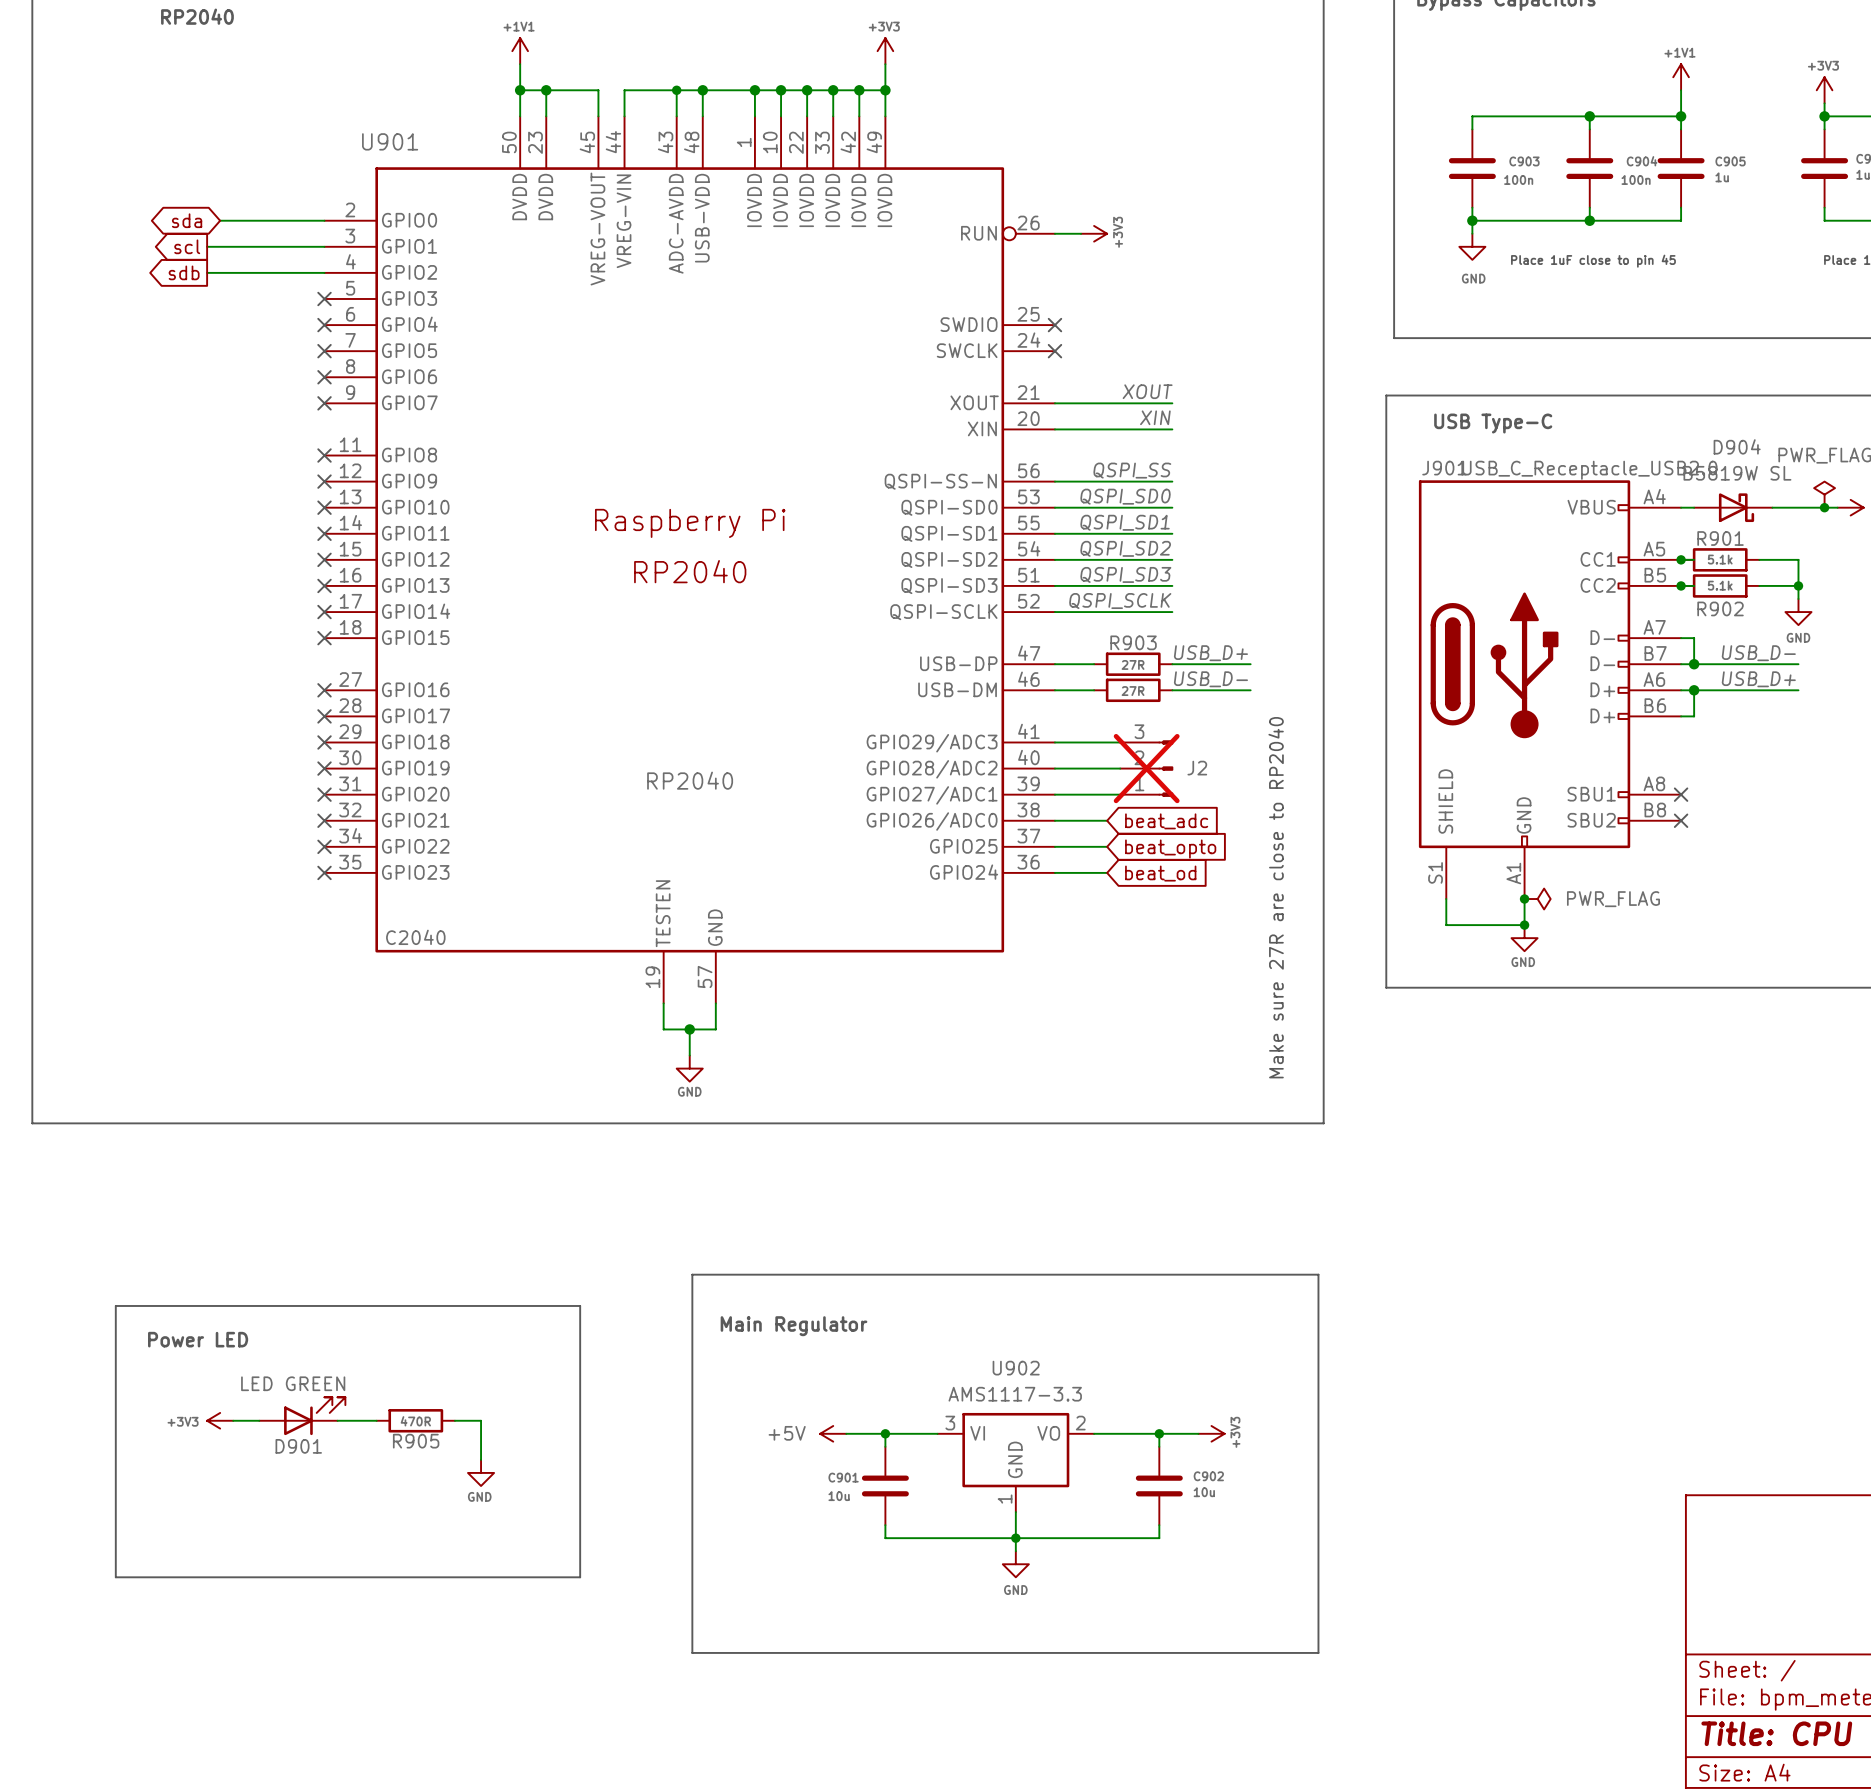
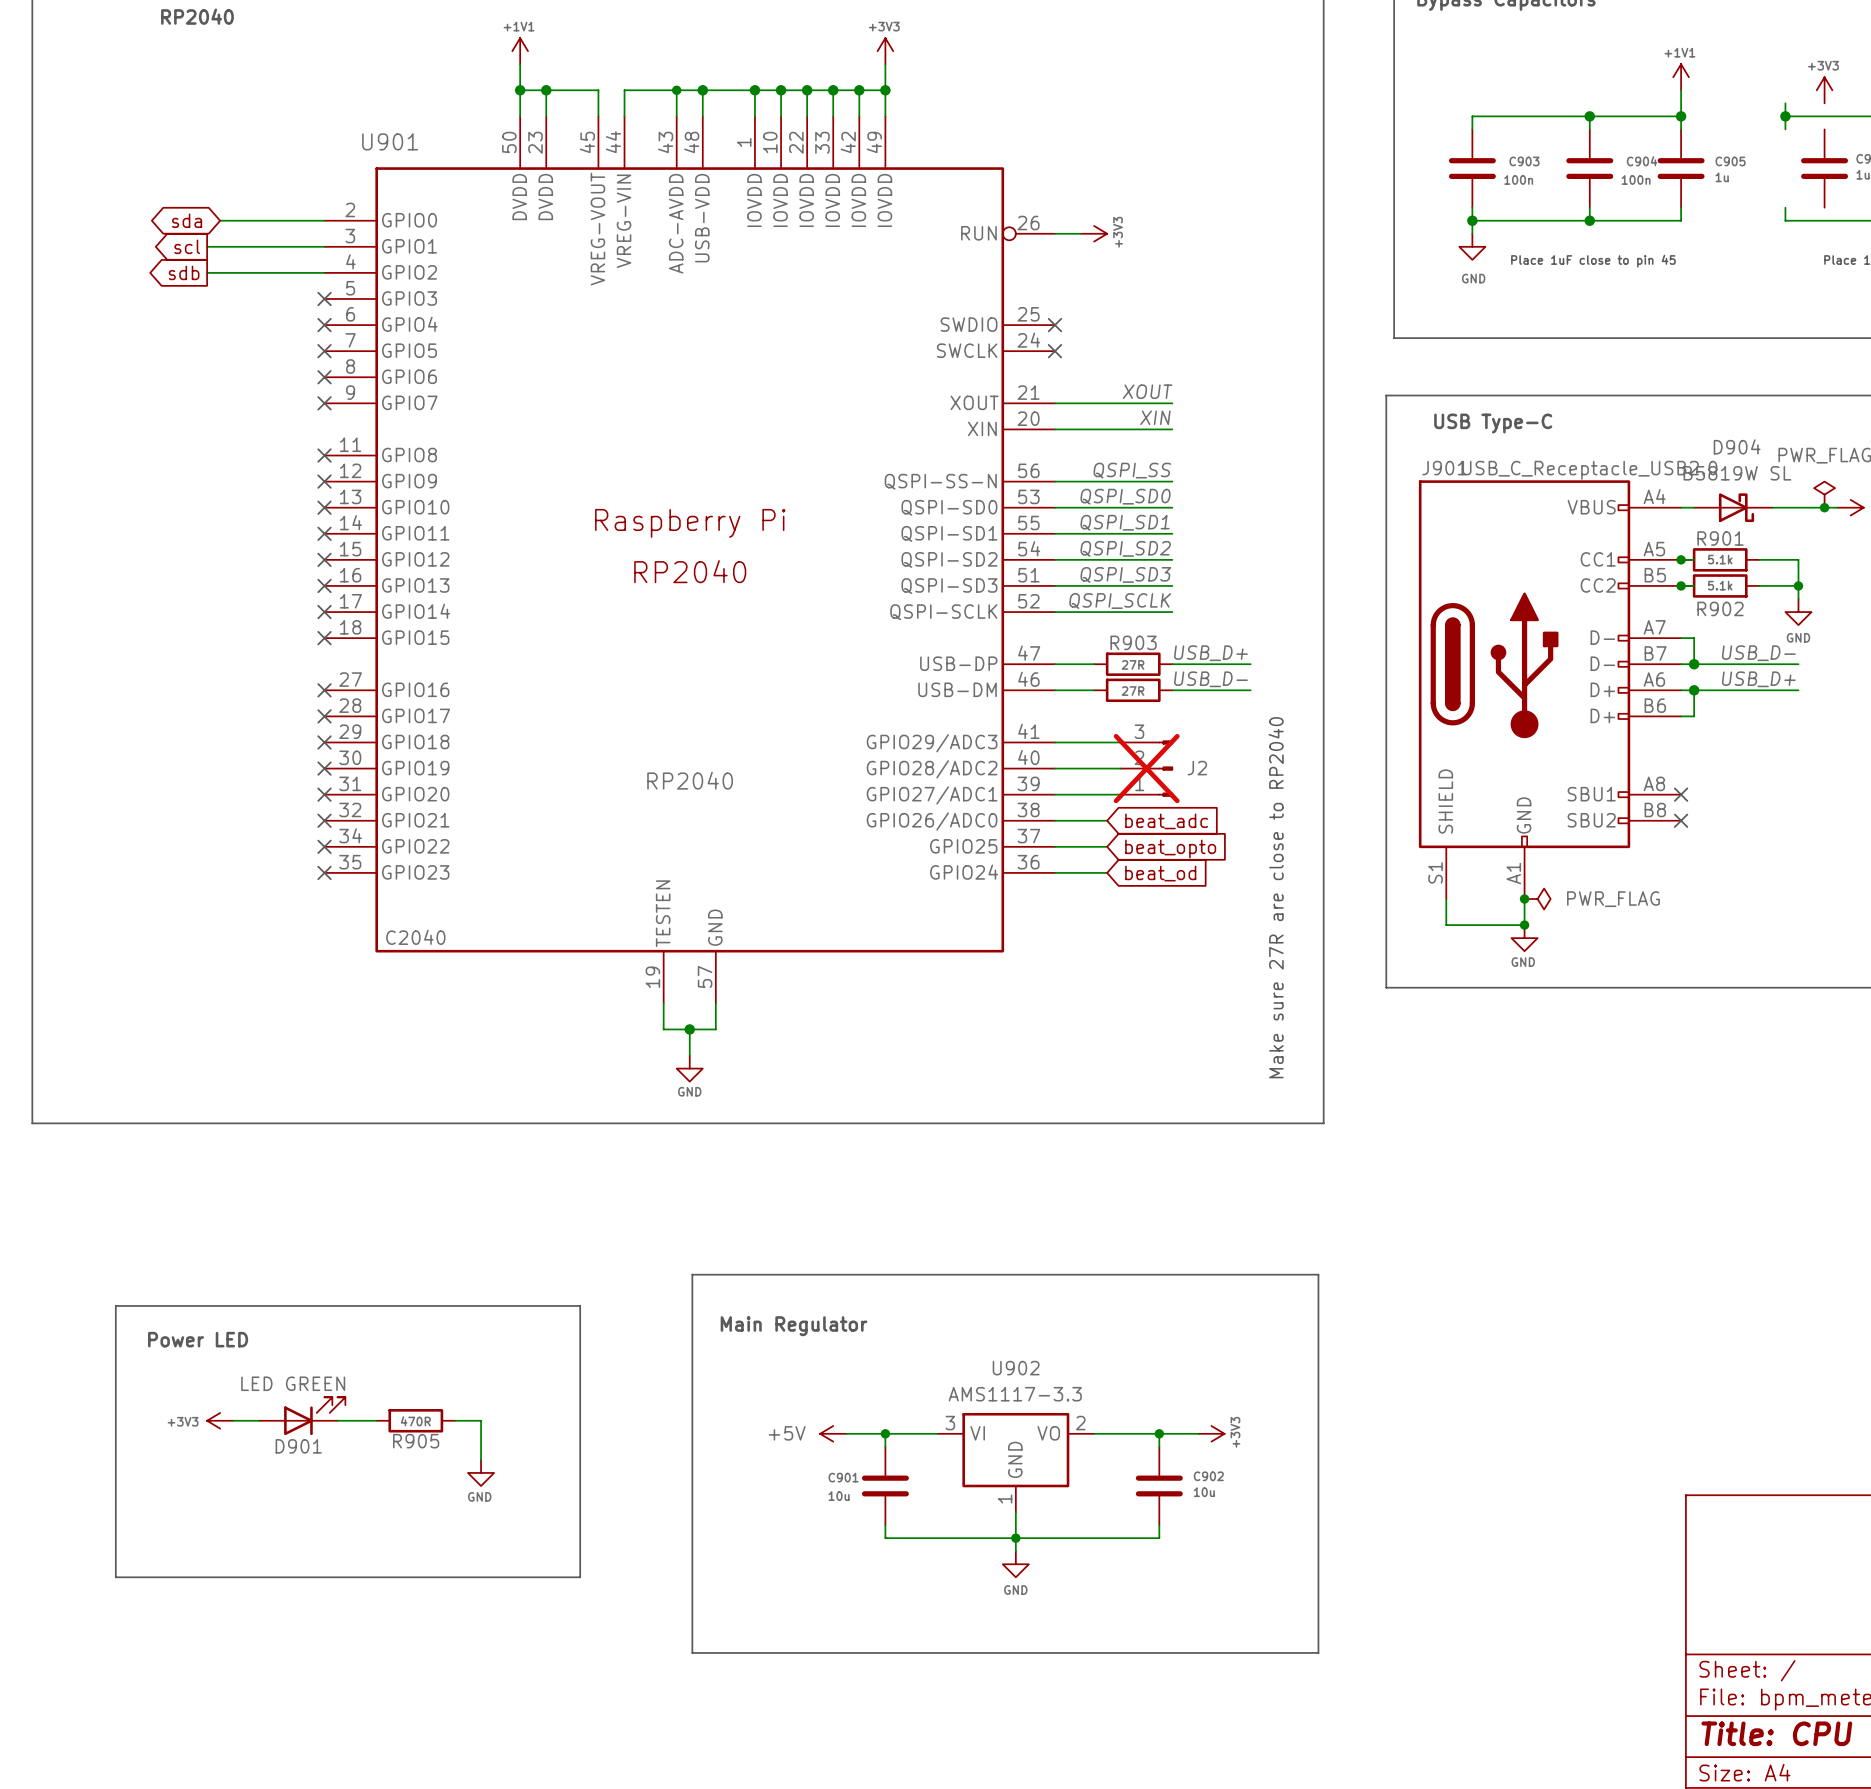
wire: (1824, 103) (1824, 129) -> (1785, 103) (1785, 129)
wire: none -> (1785, 116) (1824, 116)
junction: none -> (1785, 116)
junction: (1824, 116) -> none
wire: (1824, 207) (1824, 220) -> (1785, 207) (1785, 220) (1824, 220)

